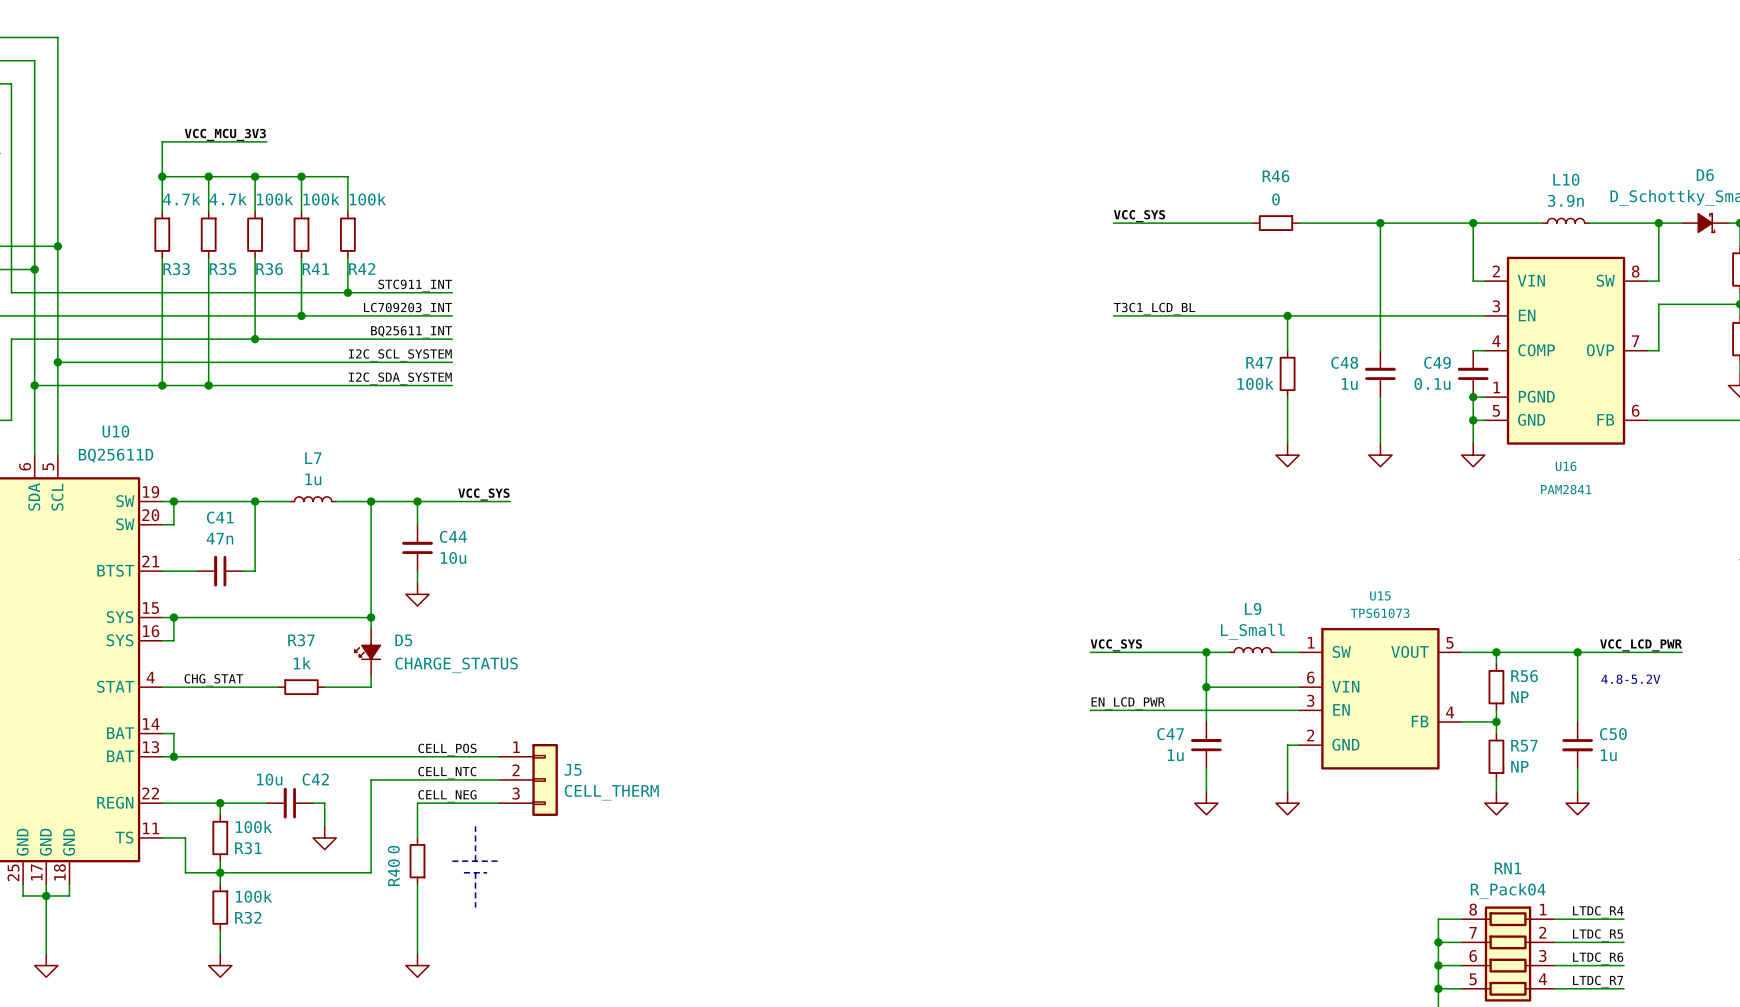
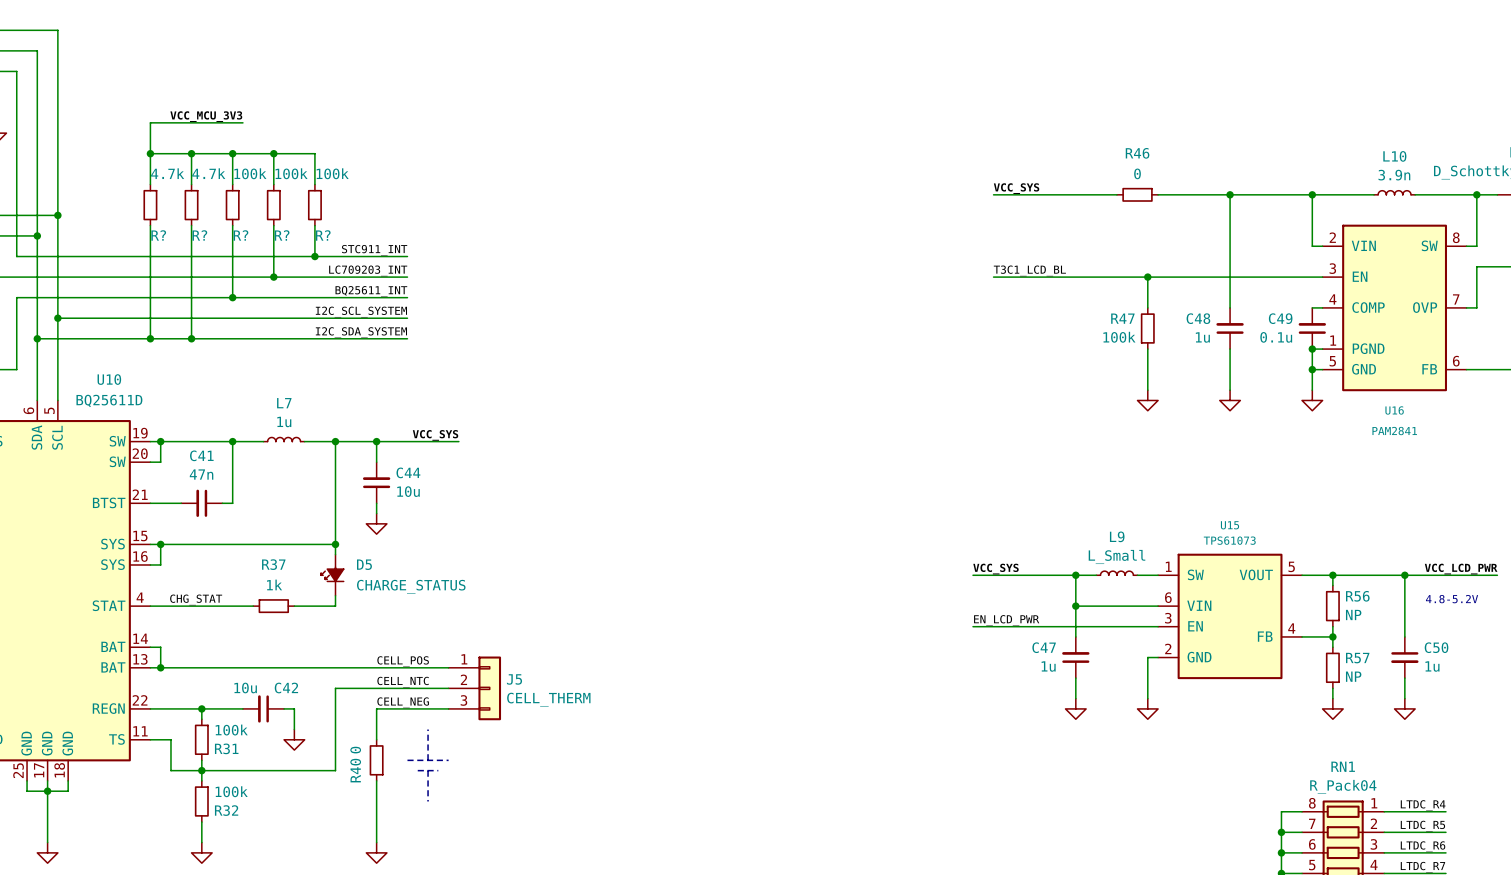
R42 name: R42 (362, 268) -> R? (323, 235)
R33 name: R33 (176, 269) -> R? (158, 235)
R35 name: R35 (222, 269) -> R? (199, 235)
R36 name: R36 (269, 269) -> R? (240, 235)
R41 name: R41 (315, 269) -> R? (282, 235)

